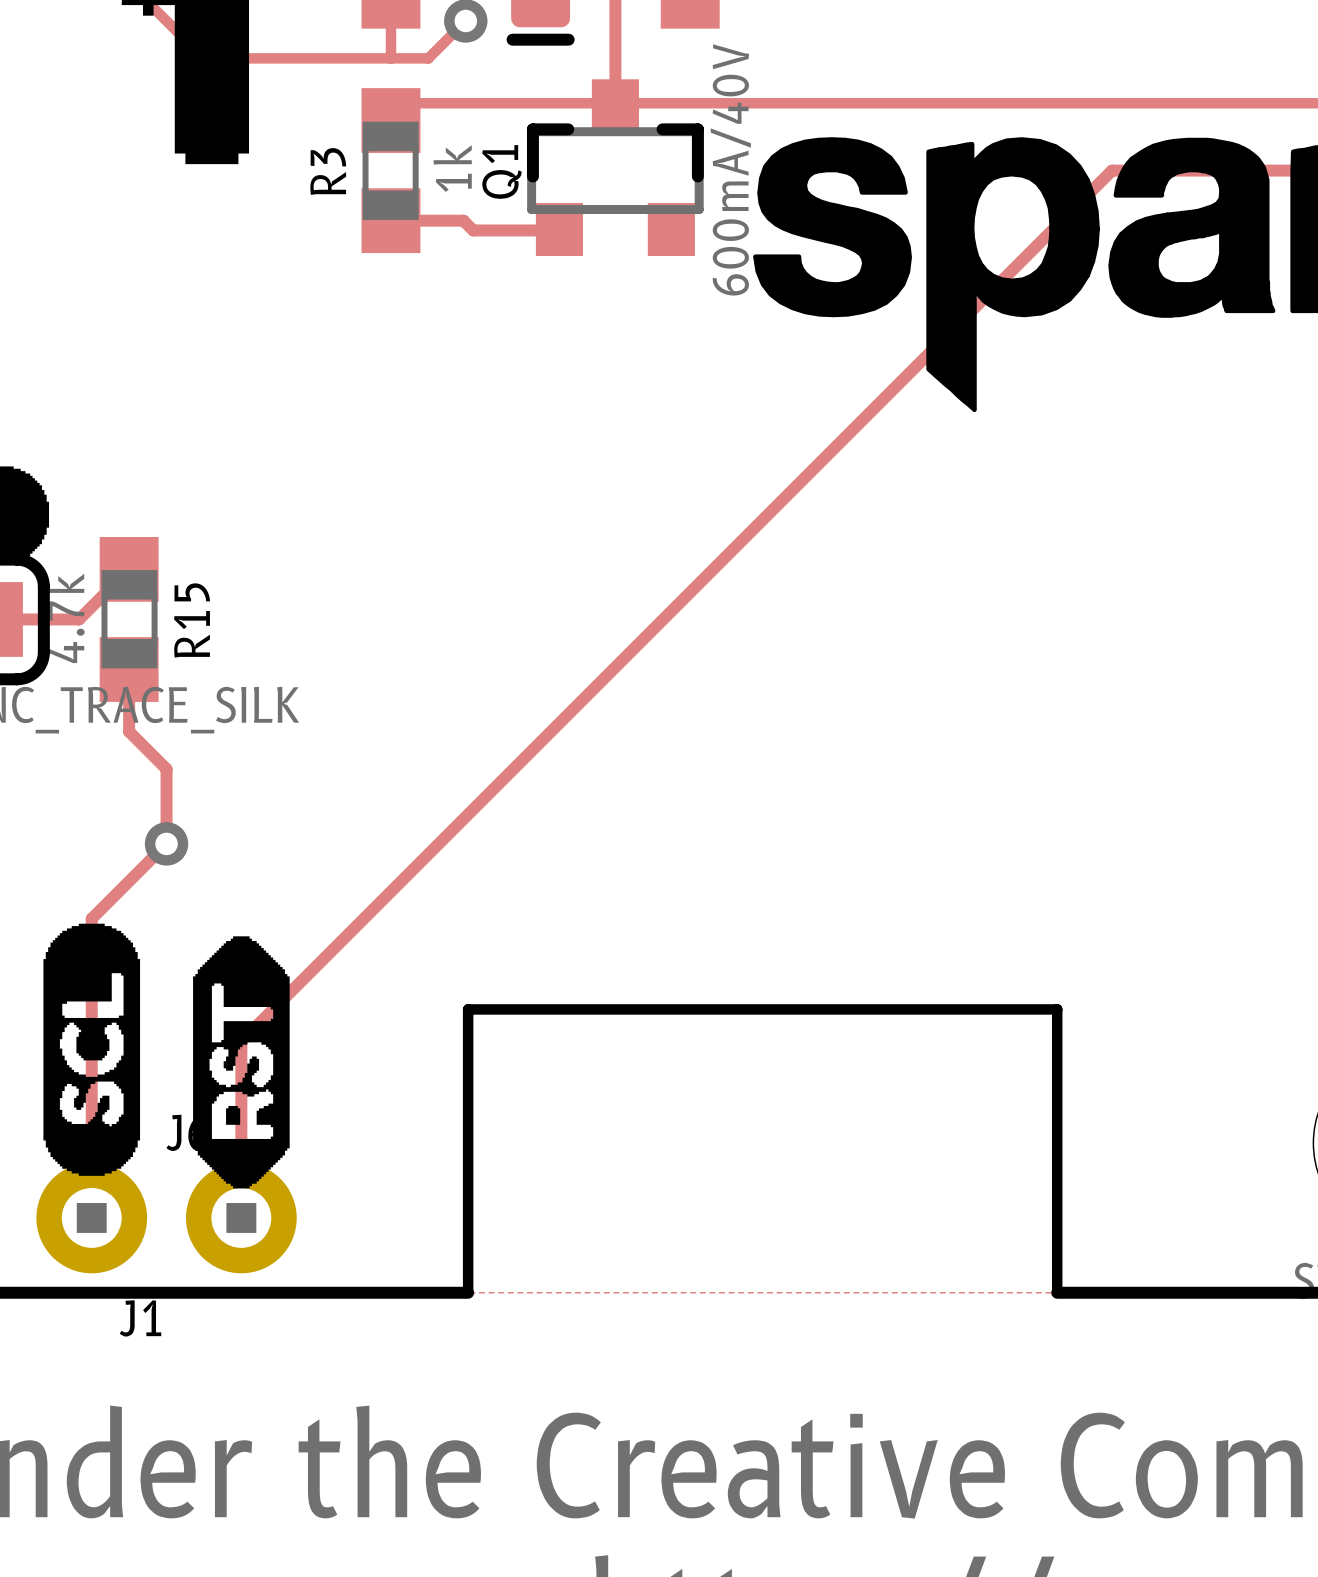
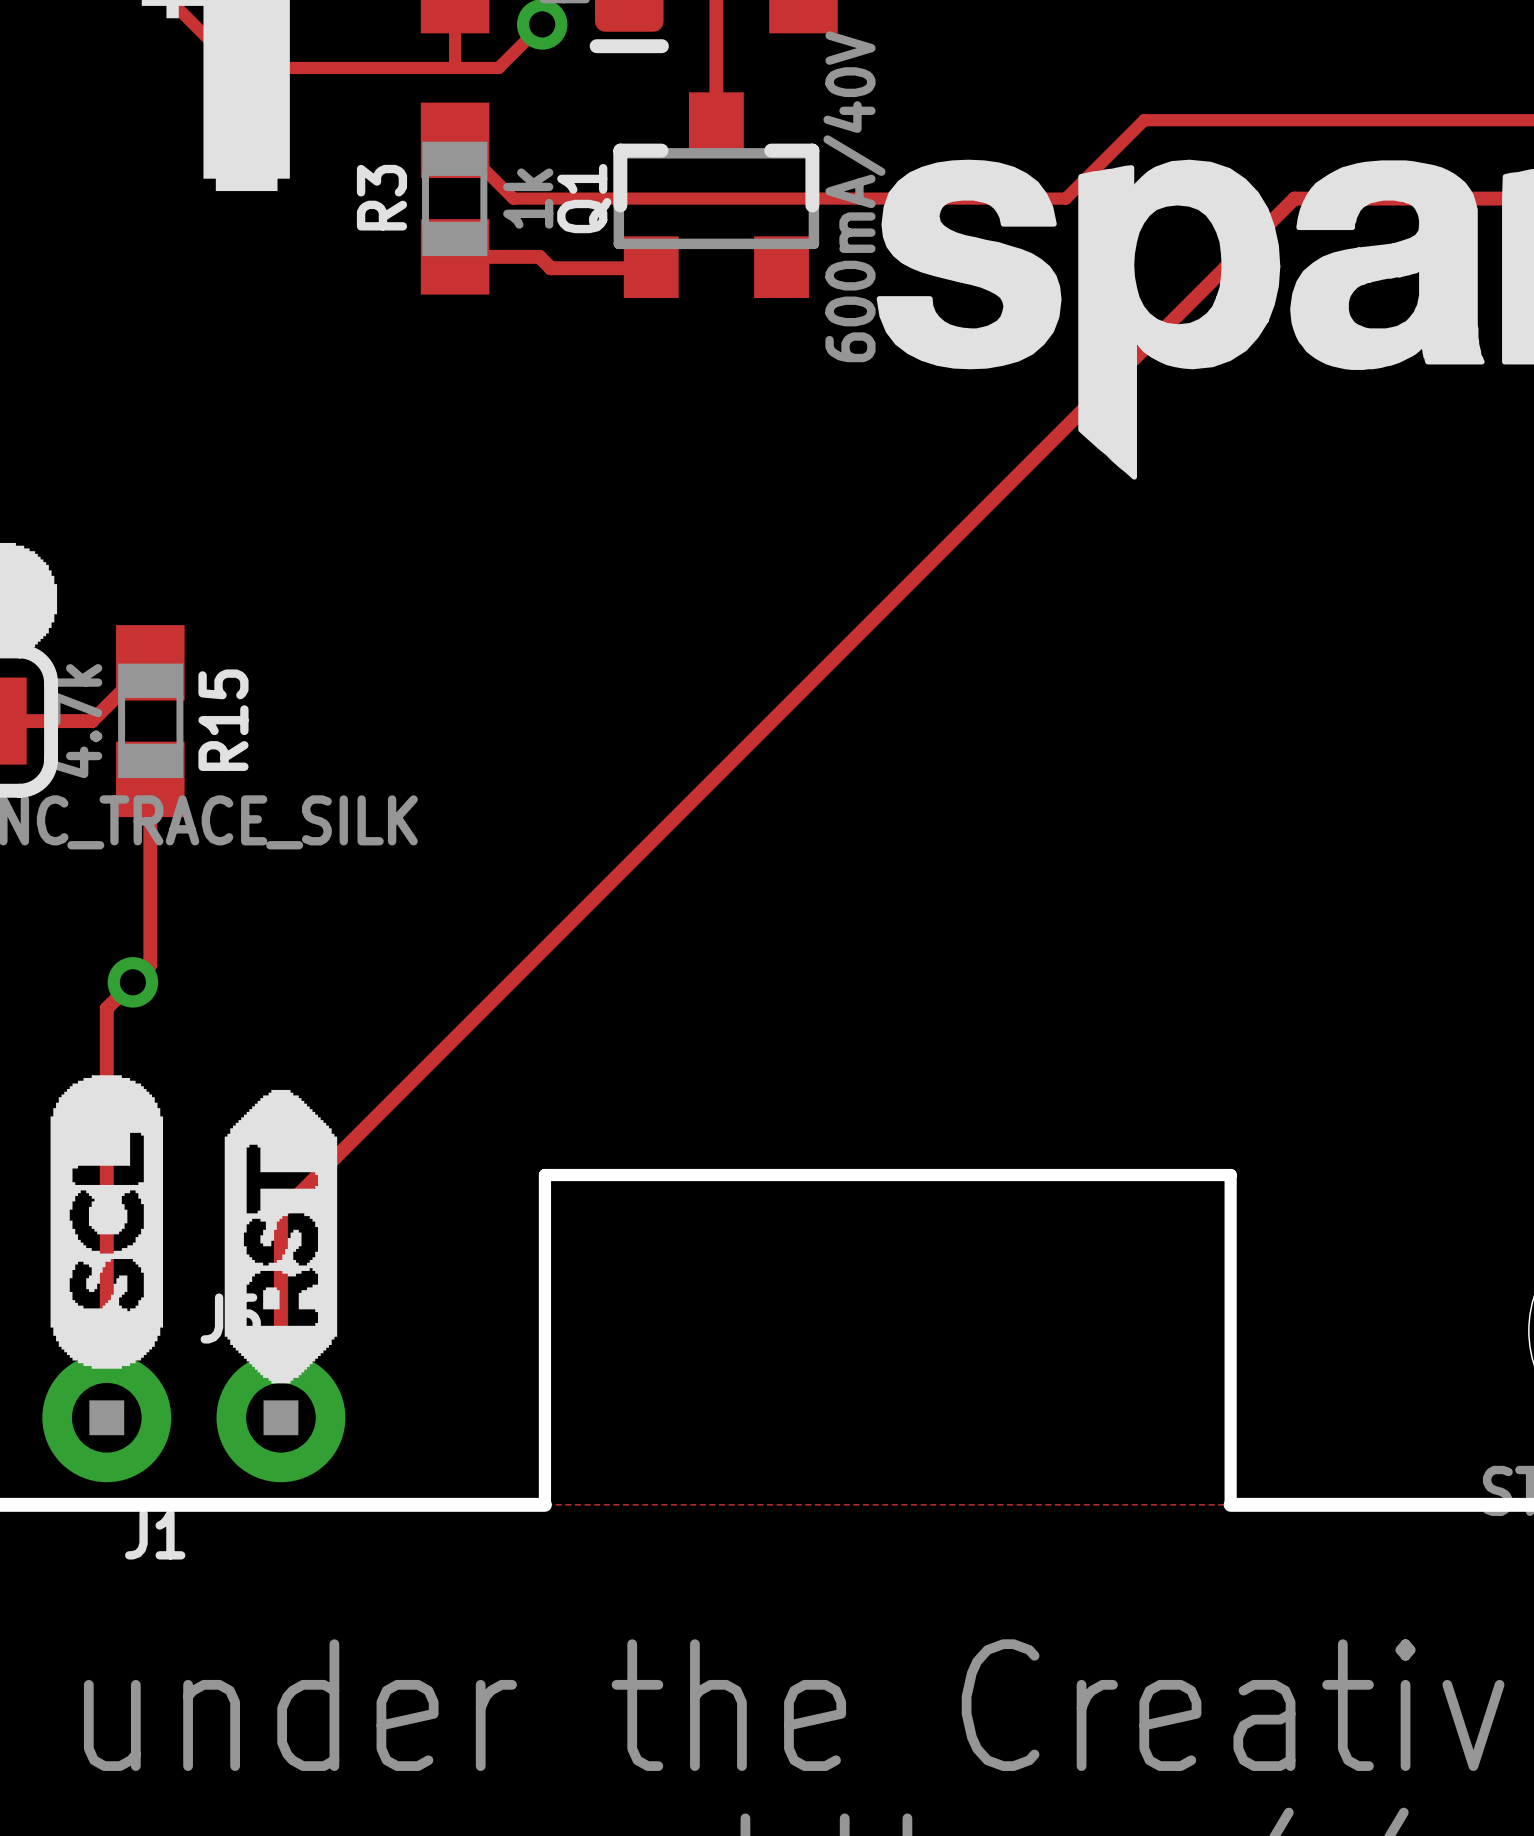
track: (982, 103) (408, 103) (390, 120) -> (1144, 120) (1065, 198) (513, 198) (455, 140)
track: (129, 731) (166, 769) (166, 843) (91, 918) -> (150, 851) (150, 964) (106, 1008) (106, 1069)
via position: (166, 843) -> (132, 982)

